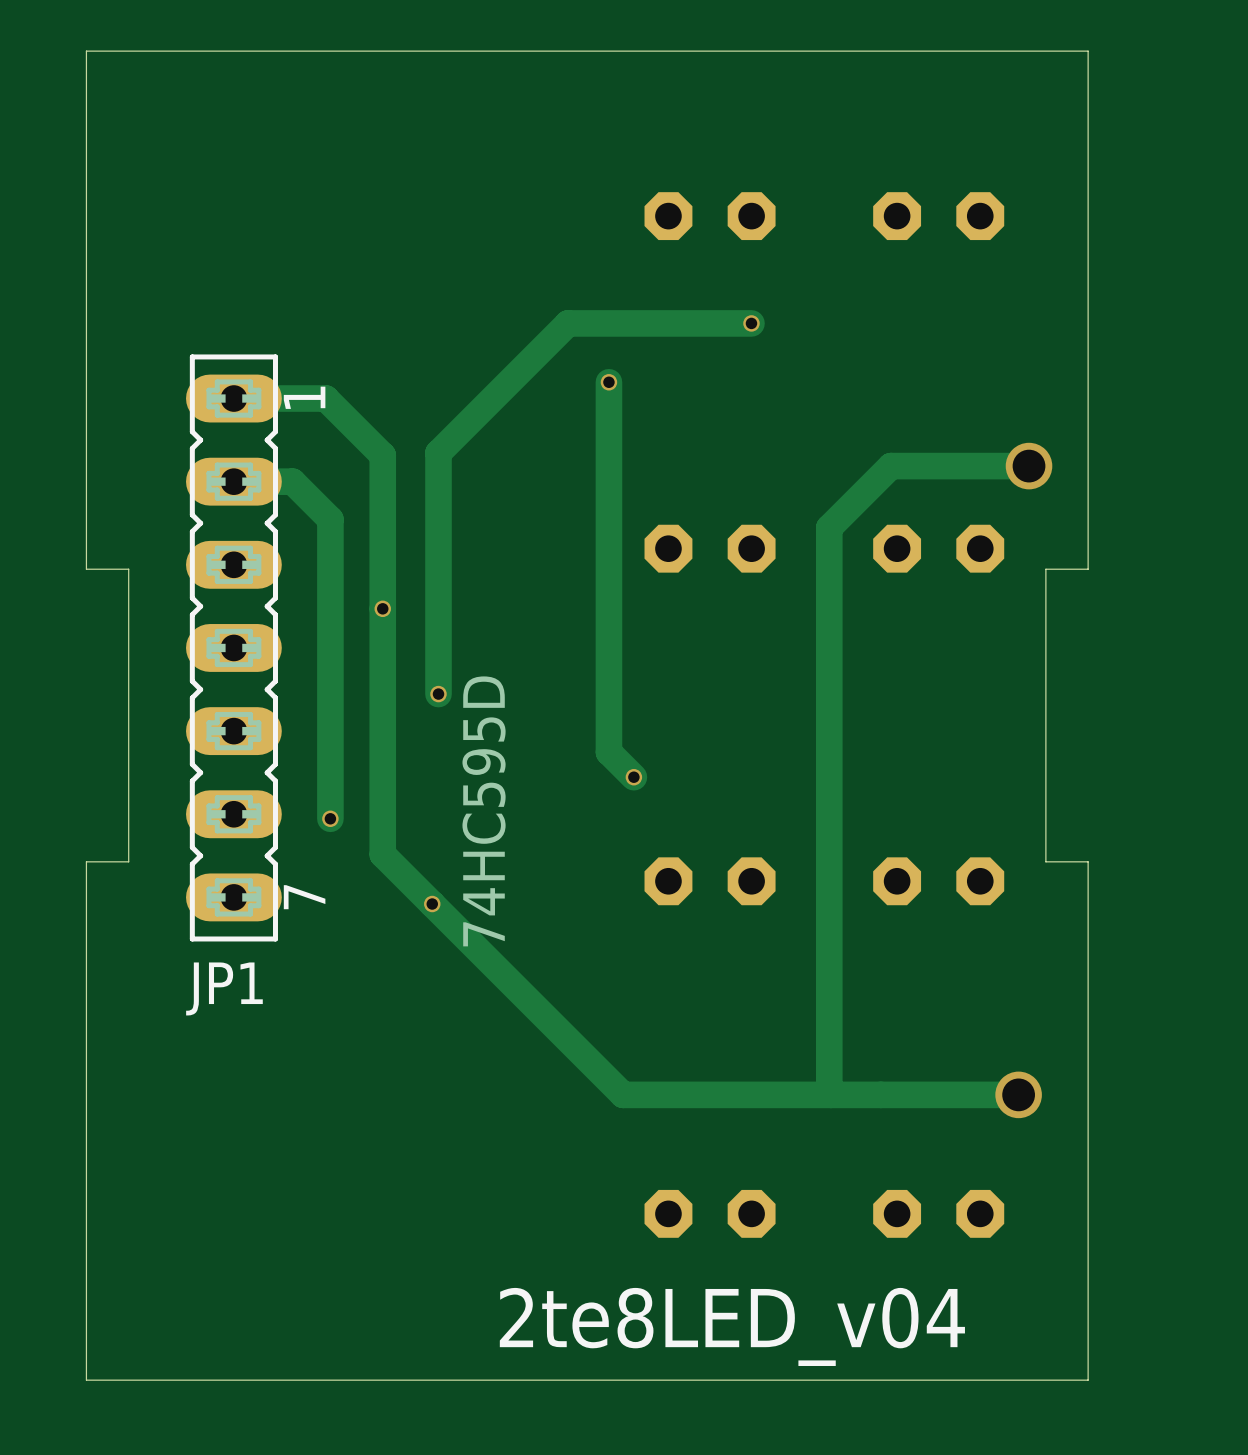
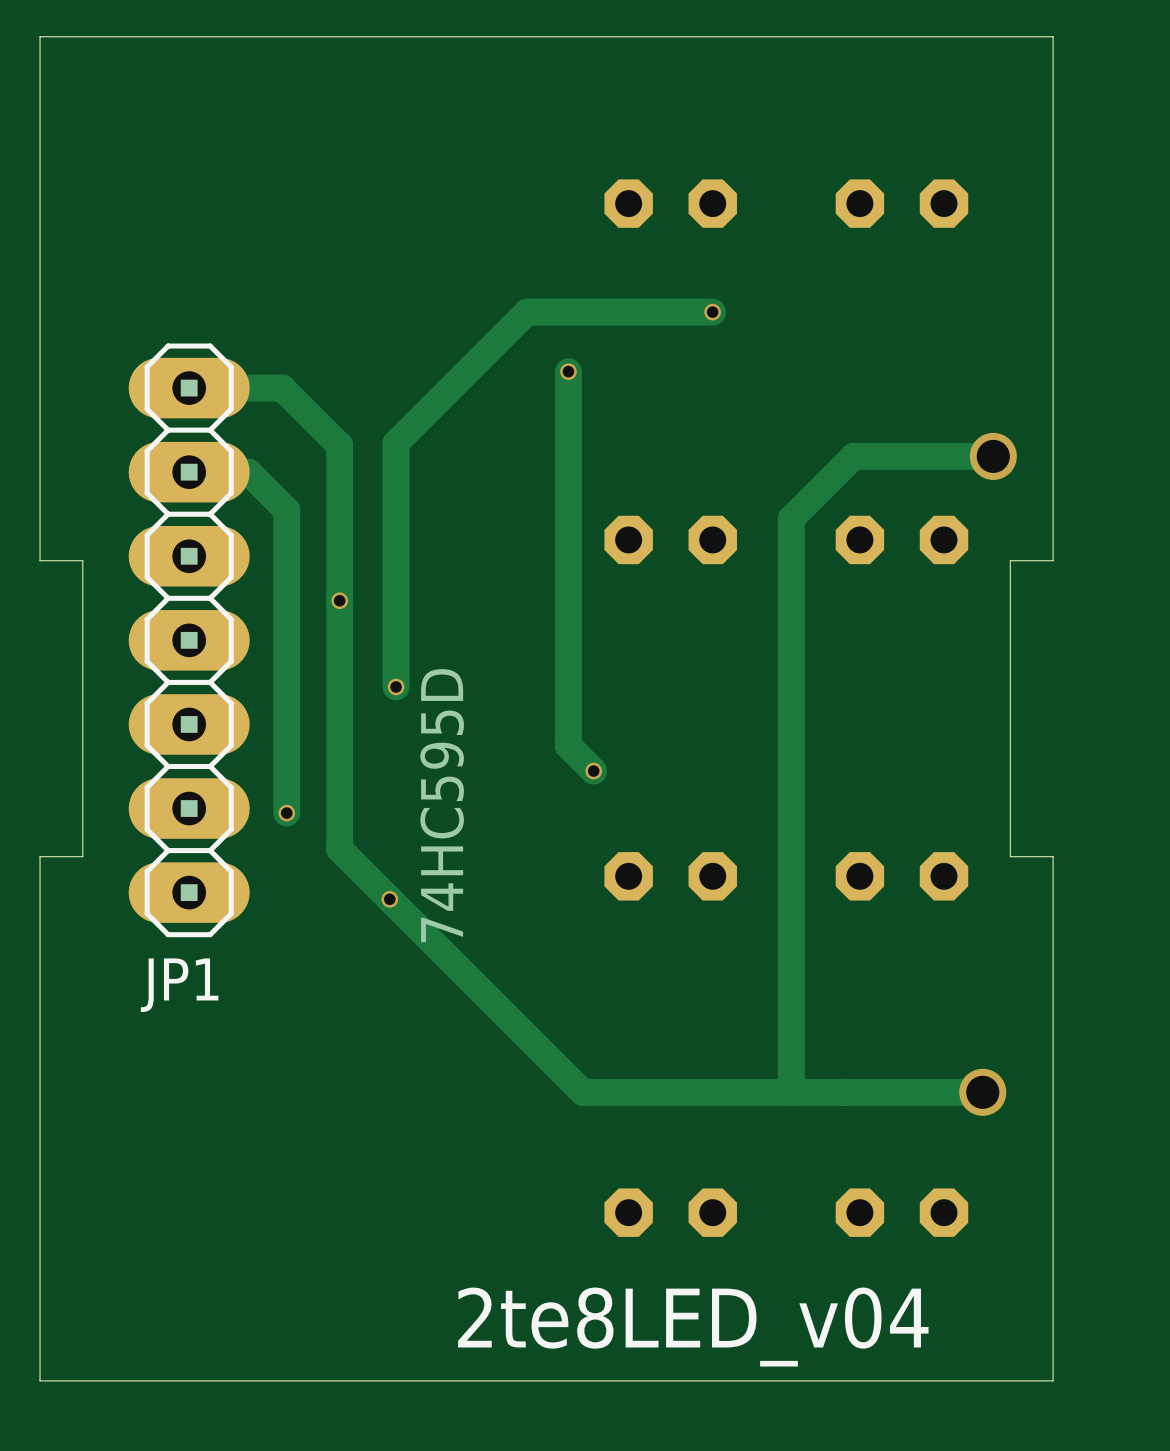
JP1 footprint: [186, 354, 282, 942] -> [128, 343, 250, 938]

